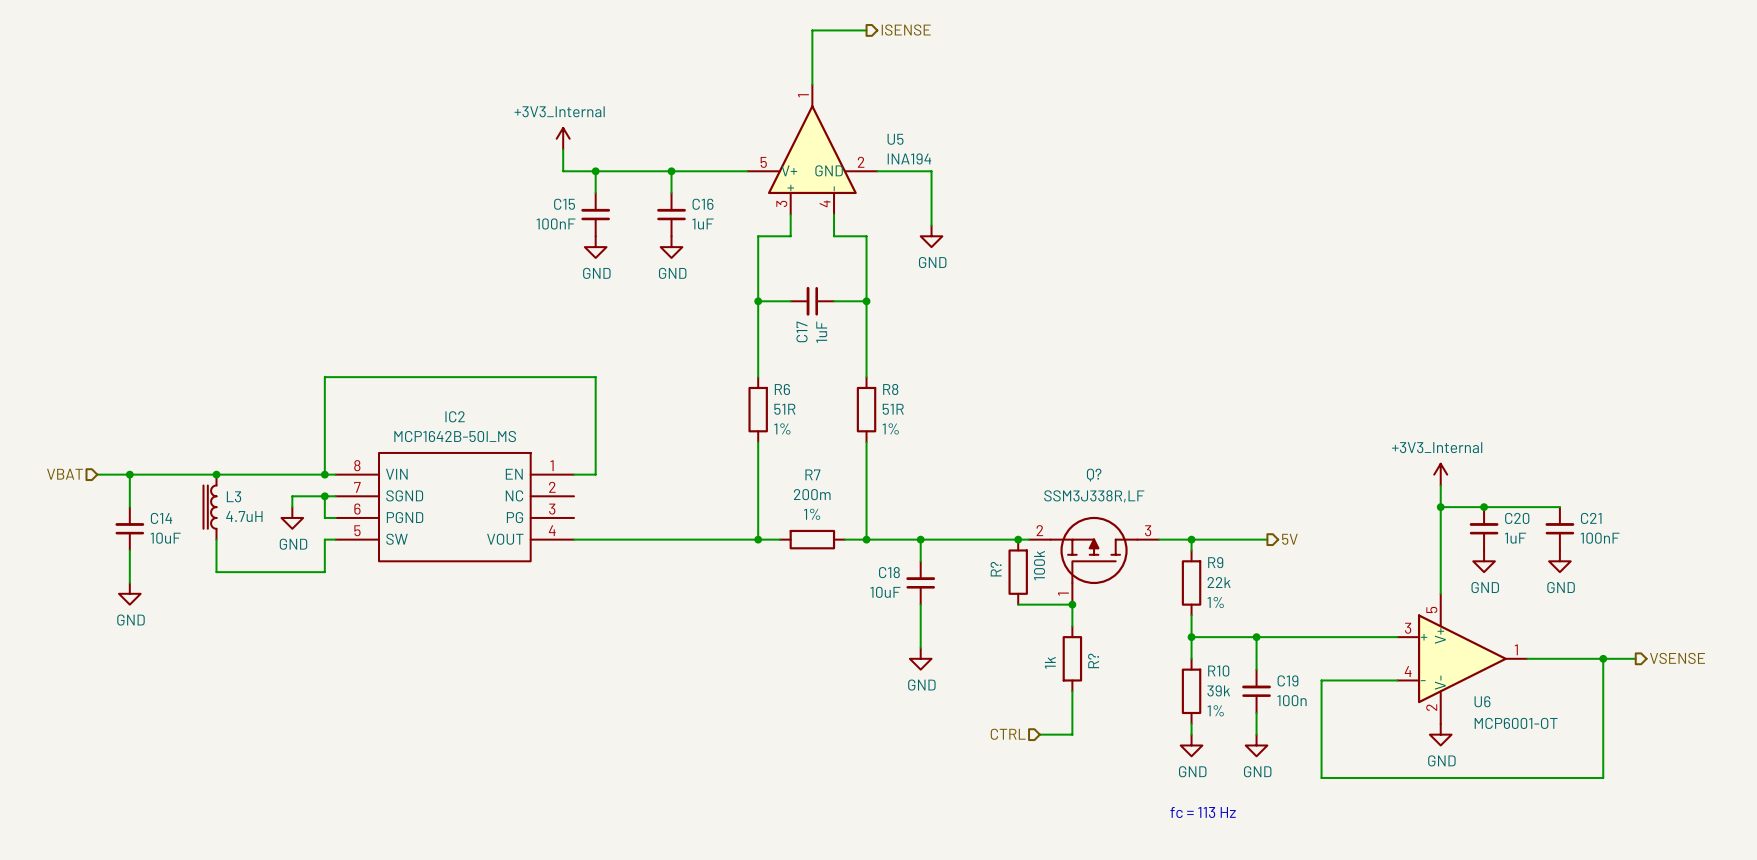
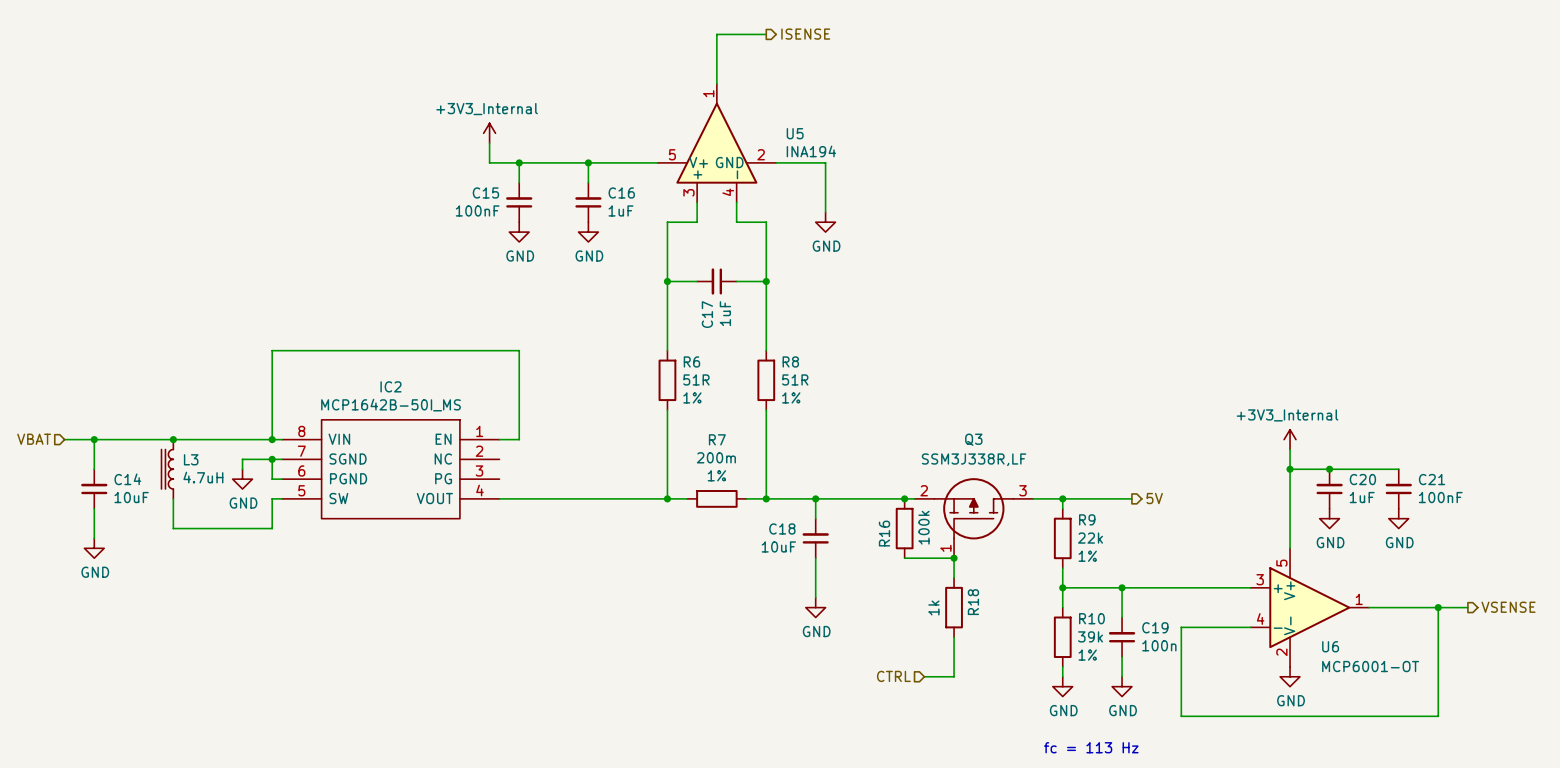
Q? name: Q? (1094, 475) -> Q3 (973, 439)
R? name: R? (996, 569) -> R16 (884, 533)
R? name: R? (1093, 660) -> R18 (973, 602)

